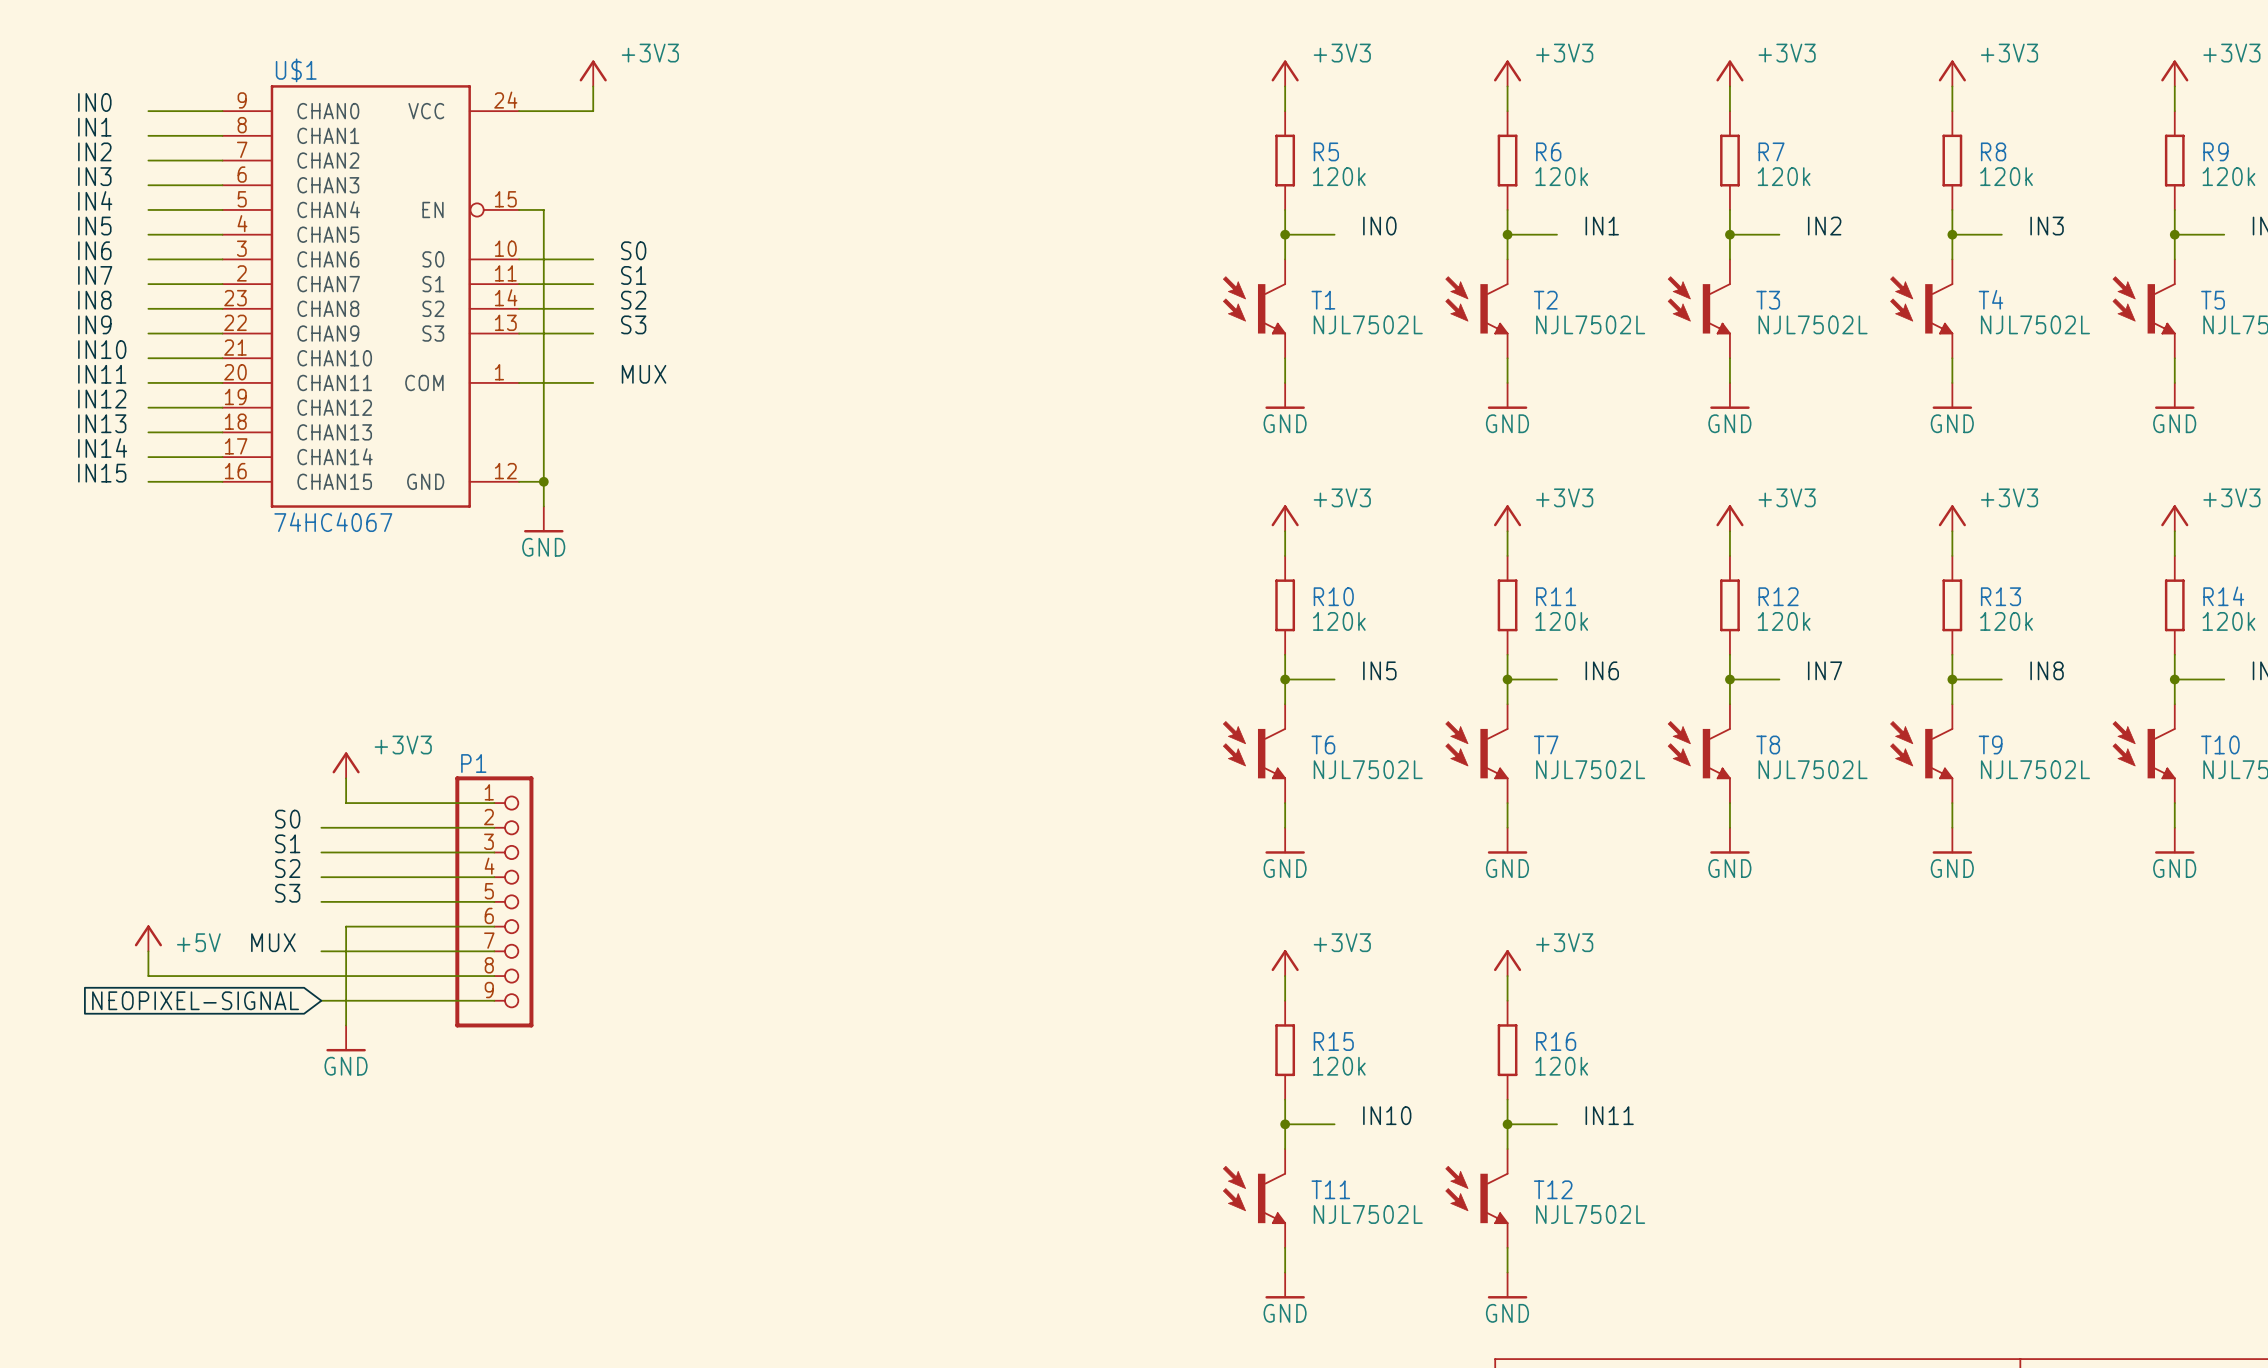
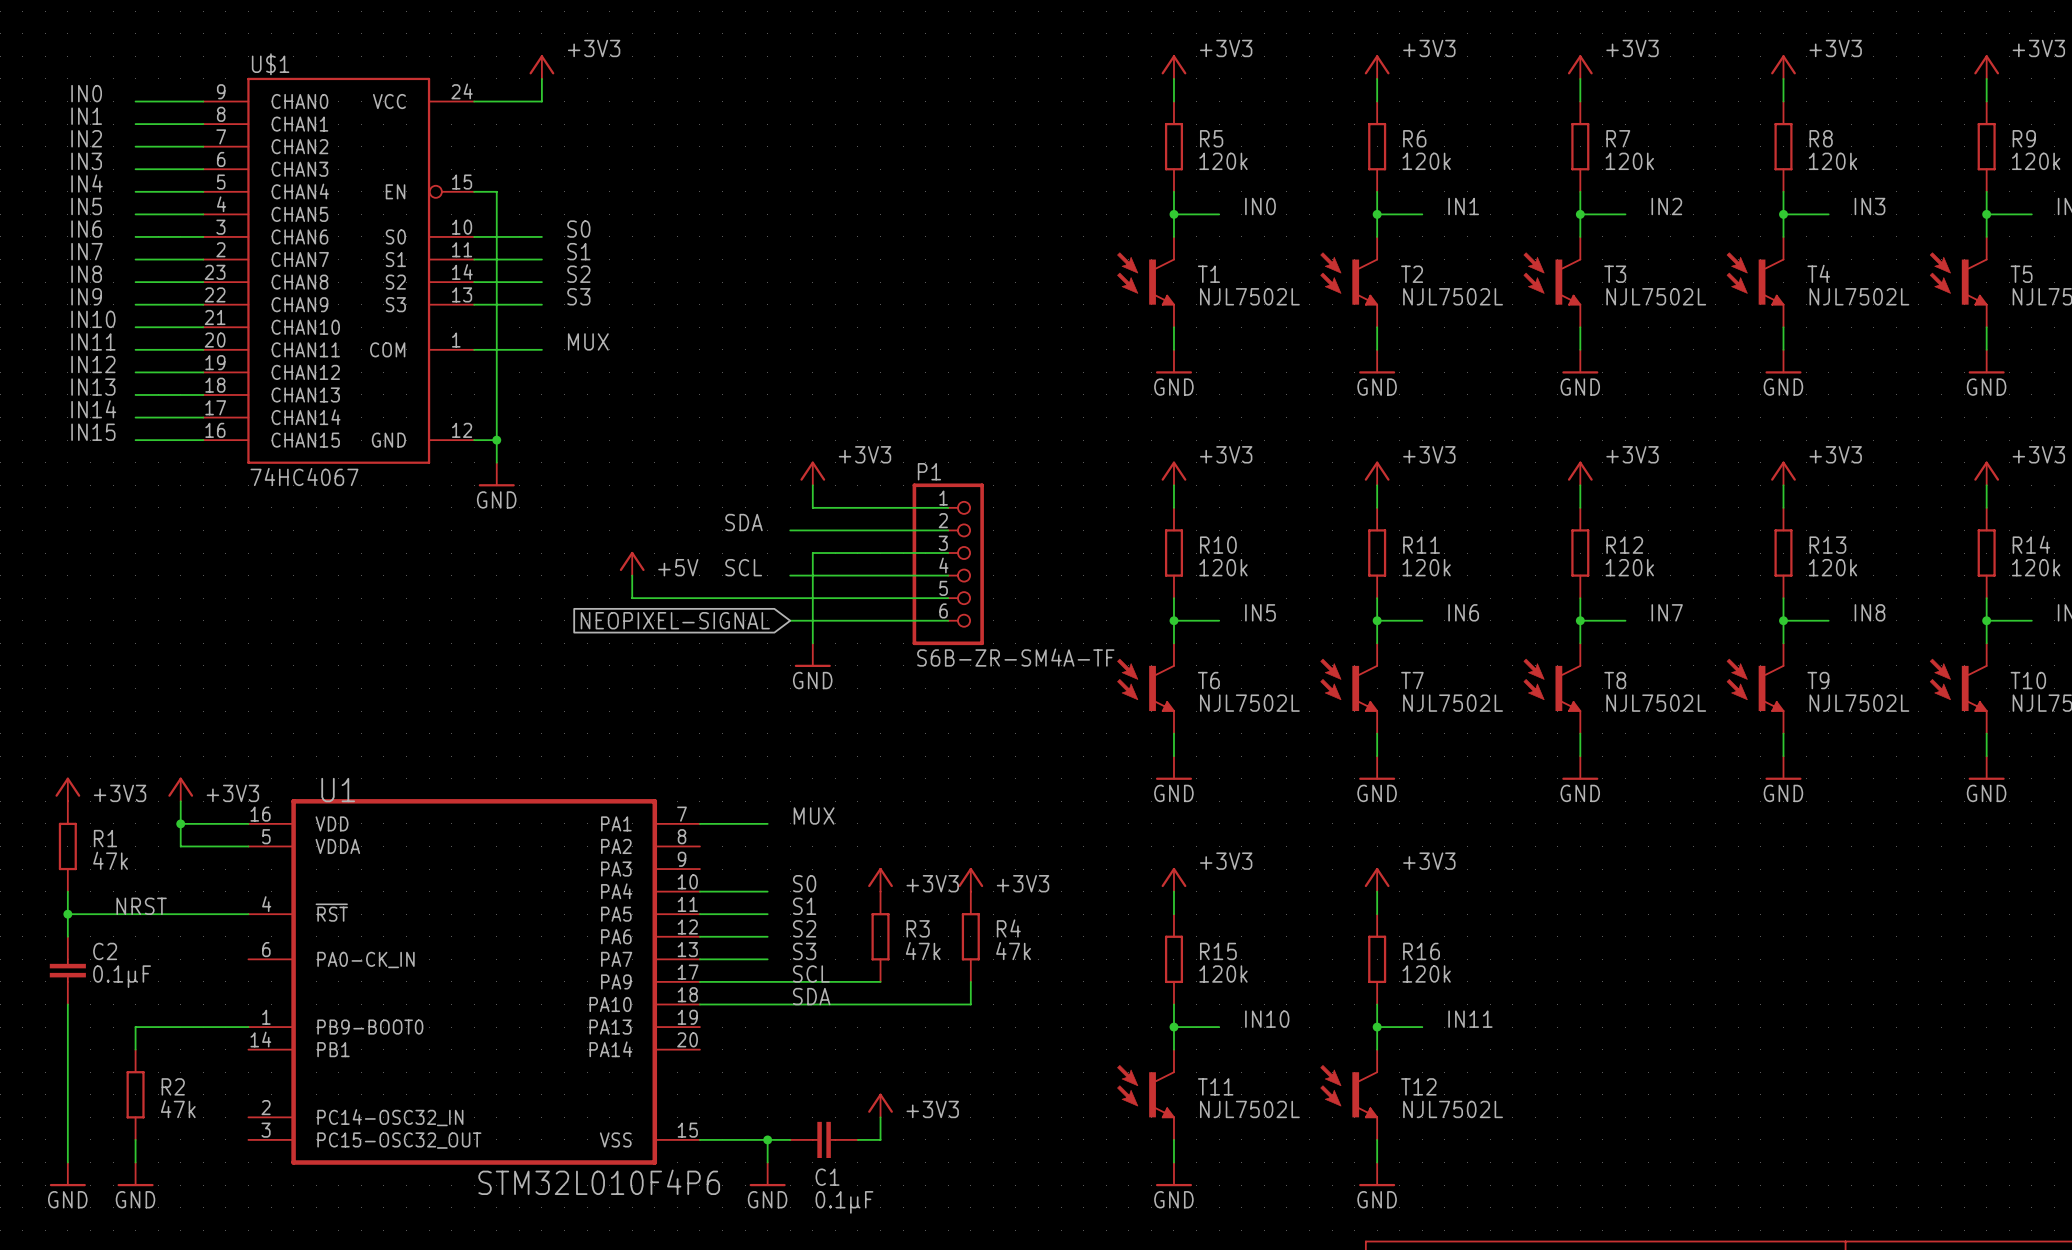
power symbol: none -> +3V3 (812, 473)
wire: none -> (812, 485) (812, 507) (948, 507)
label: none -> SDA (743, 522)
wire: none -> (790, 530) (948, 530)
wire: none -> (948, 553) (812, 553) (812, 643)
power symbol: none -> +5V (632, 563)
label: none -> SCL (743, 567)
wire: none -> (632, 575) (632, 598) (948, 598)
wire: none -> (790, 575) (948, 575)
global label: none -> NEOPIXEL-SIGNAL (675, 620)
wire: none -> (790, 620) (948, 620)
power symbol: none -> GND (812, 655)
P1 value: none -> S6B-ZR-SM4A-TF (1015, 657)
P1 name position: P1 (473, 763) -> P1 (929, 471)
power symbol: +3V3 (346, 765) -> none
P1 symbol: [455, 776, 534, 1028] -> [912, 483, 984, 646]
wire: (346, 778) (346, 803) (494, 803) -> none
label: S0 (287, 819) -> none
wire: (321, 827) (494, 827) -> none
label: S1 (287, 843) -> none
wire: (321, 852) (494, 852) -> none
power symbol: none -> +3V3 (67, 789)
power symbol: none -> +3V3 (180, 789)
label: S2 (287, 868) -> none
wire: none -> (180, 801) (180, 846) (248, 846)
label: S3 (287, 893) -> none
label: none -> MUX (814, 815)
wire: none -> (180, 823) (248, 823)
junction: none -> (180, 823)
wire: (321, 901) (494, 901) -> none
wire: none -> (699, 823) (767, 823)
R1: none -> 47k (67, 846)
wire: (494, 926) (346, 926) (346, 1025) -> none
power symbol: +5V (148, 938) -> none
label: MUX (273, 942) -> none
wire: (148, 951) (148, 976) (494, 976) -> none
wire: (321, 951) (494, 951) -> none
power symbol: none -> +3V3 (880, 879)
power symbol: none -> +3V3 (970, 879)
label: none -> S0 (804, 883)
wire: none -> (67, 891) (67, 936)
wire: none -> (699, 891) (767, 891)
label: none -> NRST (141, 906)
label: none -> S1 (804, 906)
wire: none -> (67, 914) (248, 914)
junction: none -> (67, 914)
global label: NEOPIXEL-SIGNAL (195, 1000) -> none
wire: (321, 1000) (494, 1000) -> none
wire: none -> (699, 914) (767, 914)
label: none -> S2 (804, 928)
wire: none -> (699, 936) (767, 936)
R3: none -> 47k (880, 936)
R4: none -> 47k (970, 936)
power symbol: GND (346, 1038) -> none
label: none -> S3 (804, 951)
wire: none -> (699, 959) (767, 959)
C2: none -> 0.1μF (67, 970)
label: none -> SCL (811, 974)
U1: none -> (474, 981)
wire: none -> (699, 981) (880, 981)
wire: none -> (970, 981) (970, 1004) (699, 1004)
label: none -> SDA (811, 996)
wire: none -> (67, 1004) (67, 1162)
wire: none -> (248, 1027) (135, 1027) (135, 1049)
R2: none -> 47k (135, 1094)
power symbol: none -> +3V3 (880, 1105)
wire: none -> (880, 1117) (880, 1139) (857, 1139)
wire: none -> (135, 1139) (135, 1162)
wire: none -> (699, 1139) (790, 1139)
wire: none -> (767, 1139) (767, 1162)
junction: none -> (767, 1139)
C1: none -> 0.1μF (824, 1139)
power symbol: none -> GND (67, 1174)
power symbol: none -> GND (135, 1174)
power symbol: none -> GND (767, 1174)

